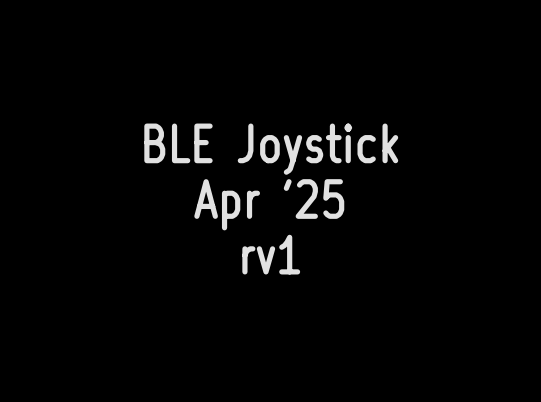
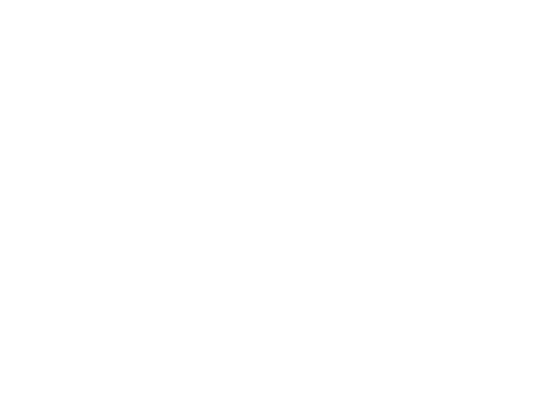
text: BLE Joystick (271, 149) -> none
text: Apr '25 (269, 204) -> none
text: rv1 (271, 254) -> none

